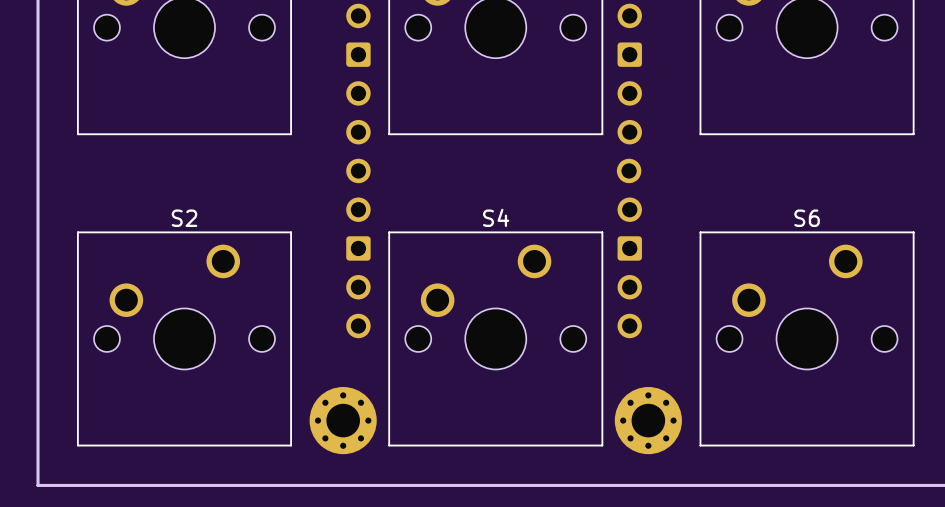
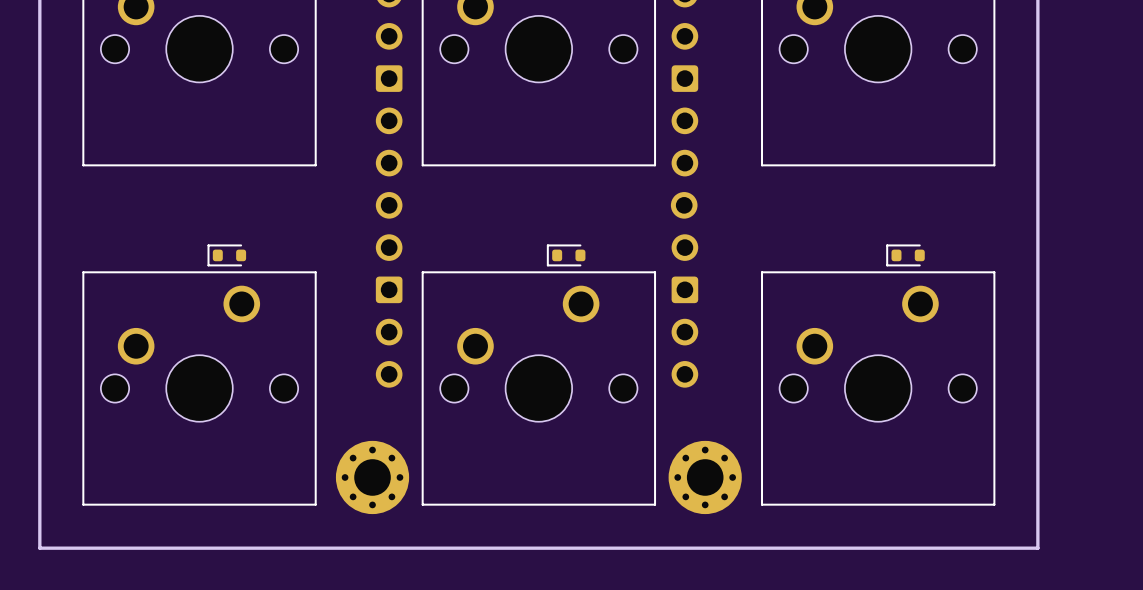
part: none -> (226, 255)
part: none -> (566, 255)
part: none -> (905, 255)
S4 name: S4 (496, 217) -> none
S2 name: S2 (184, 218) -> none
S6 name: S6 (807, 218) -> none

